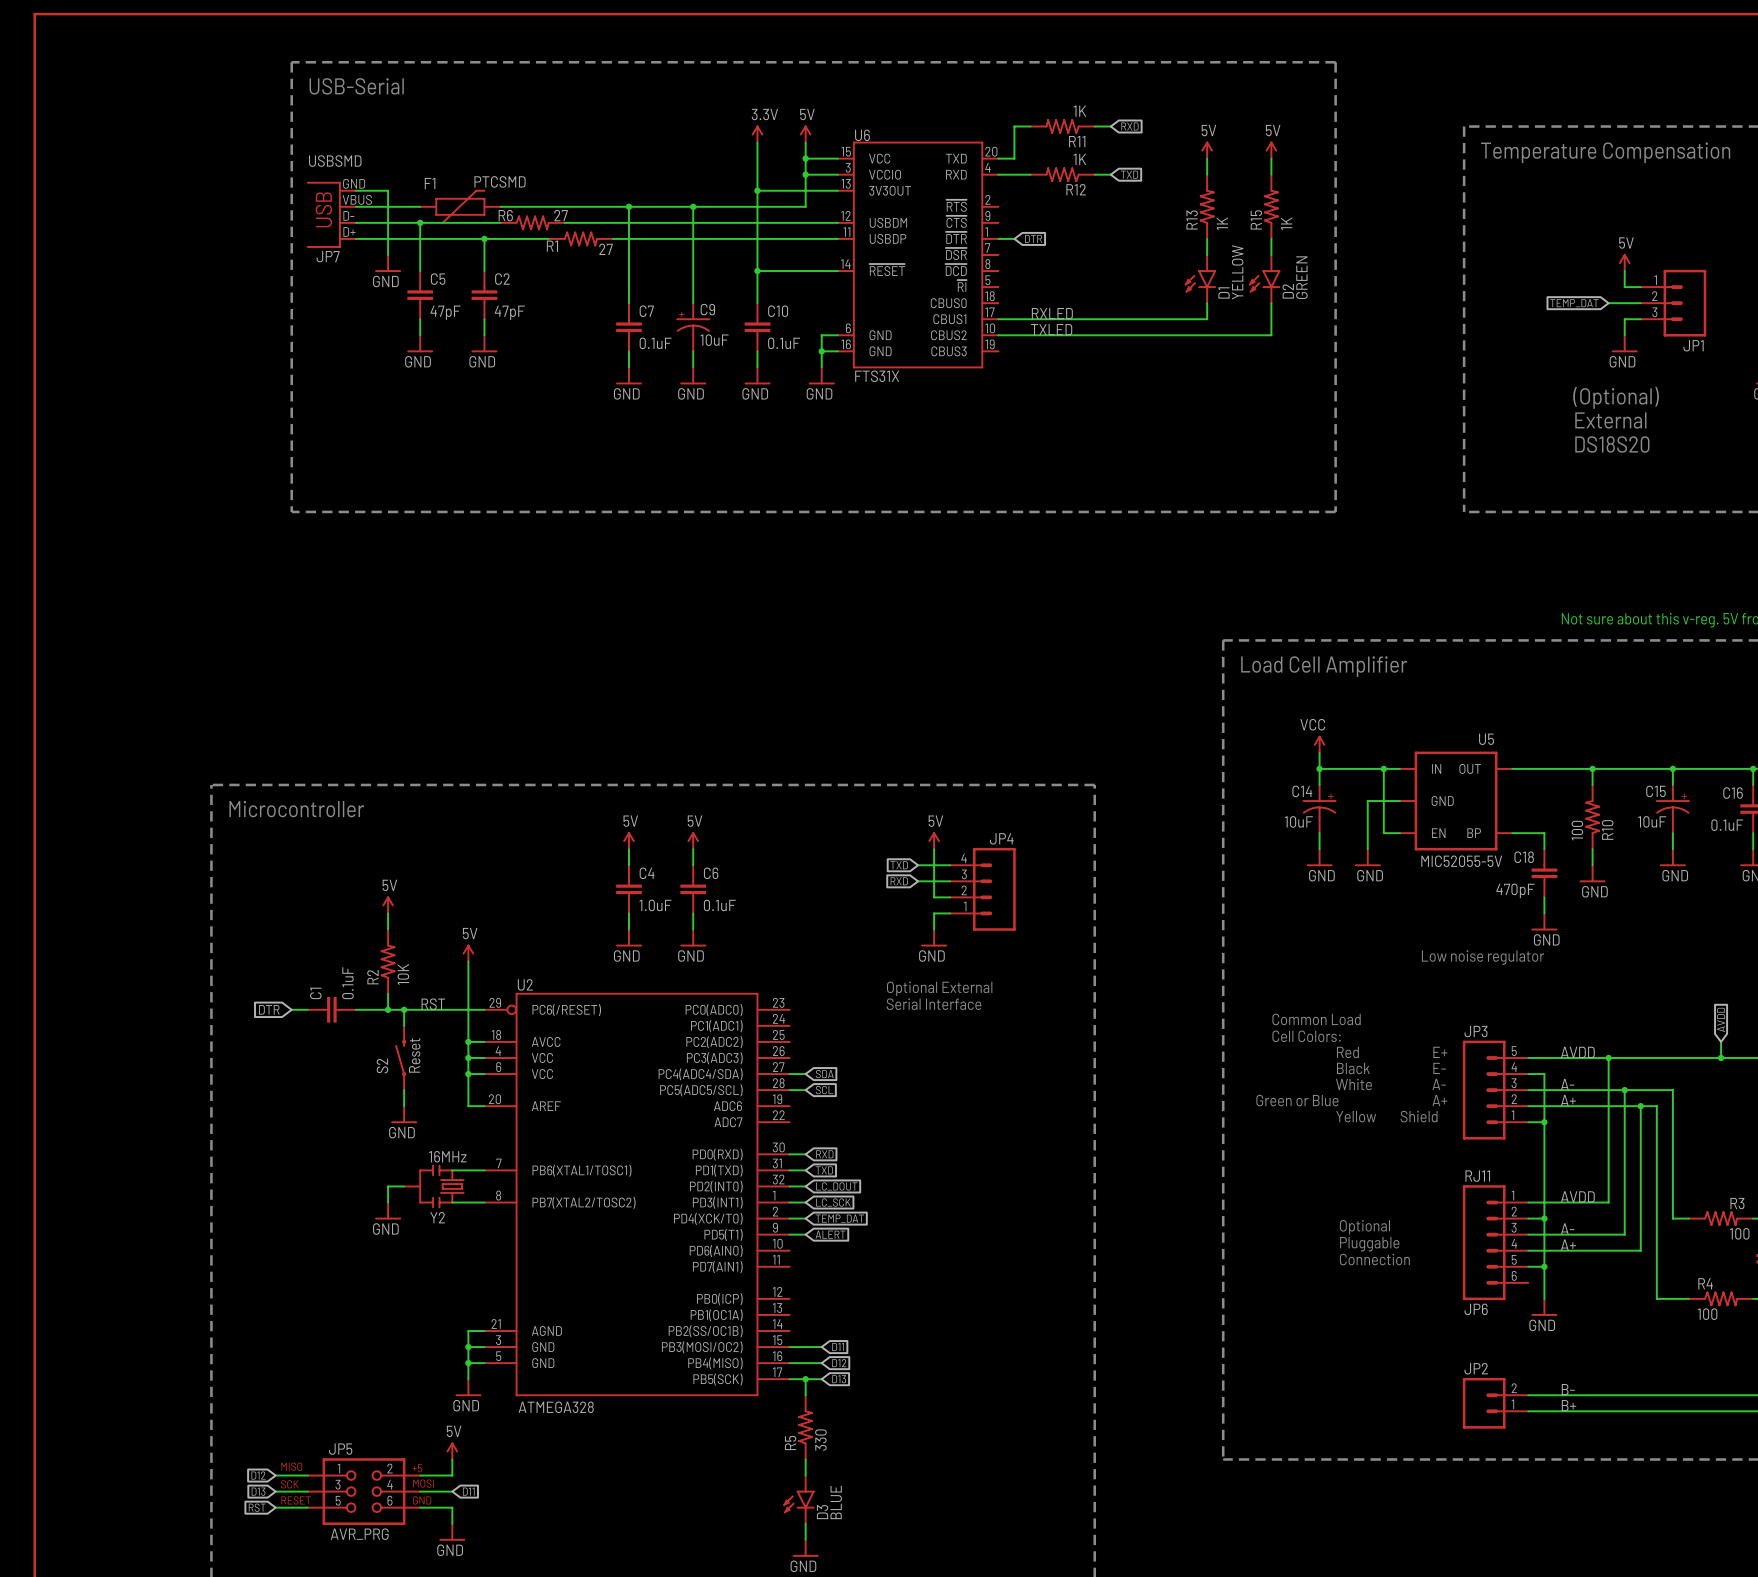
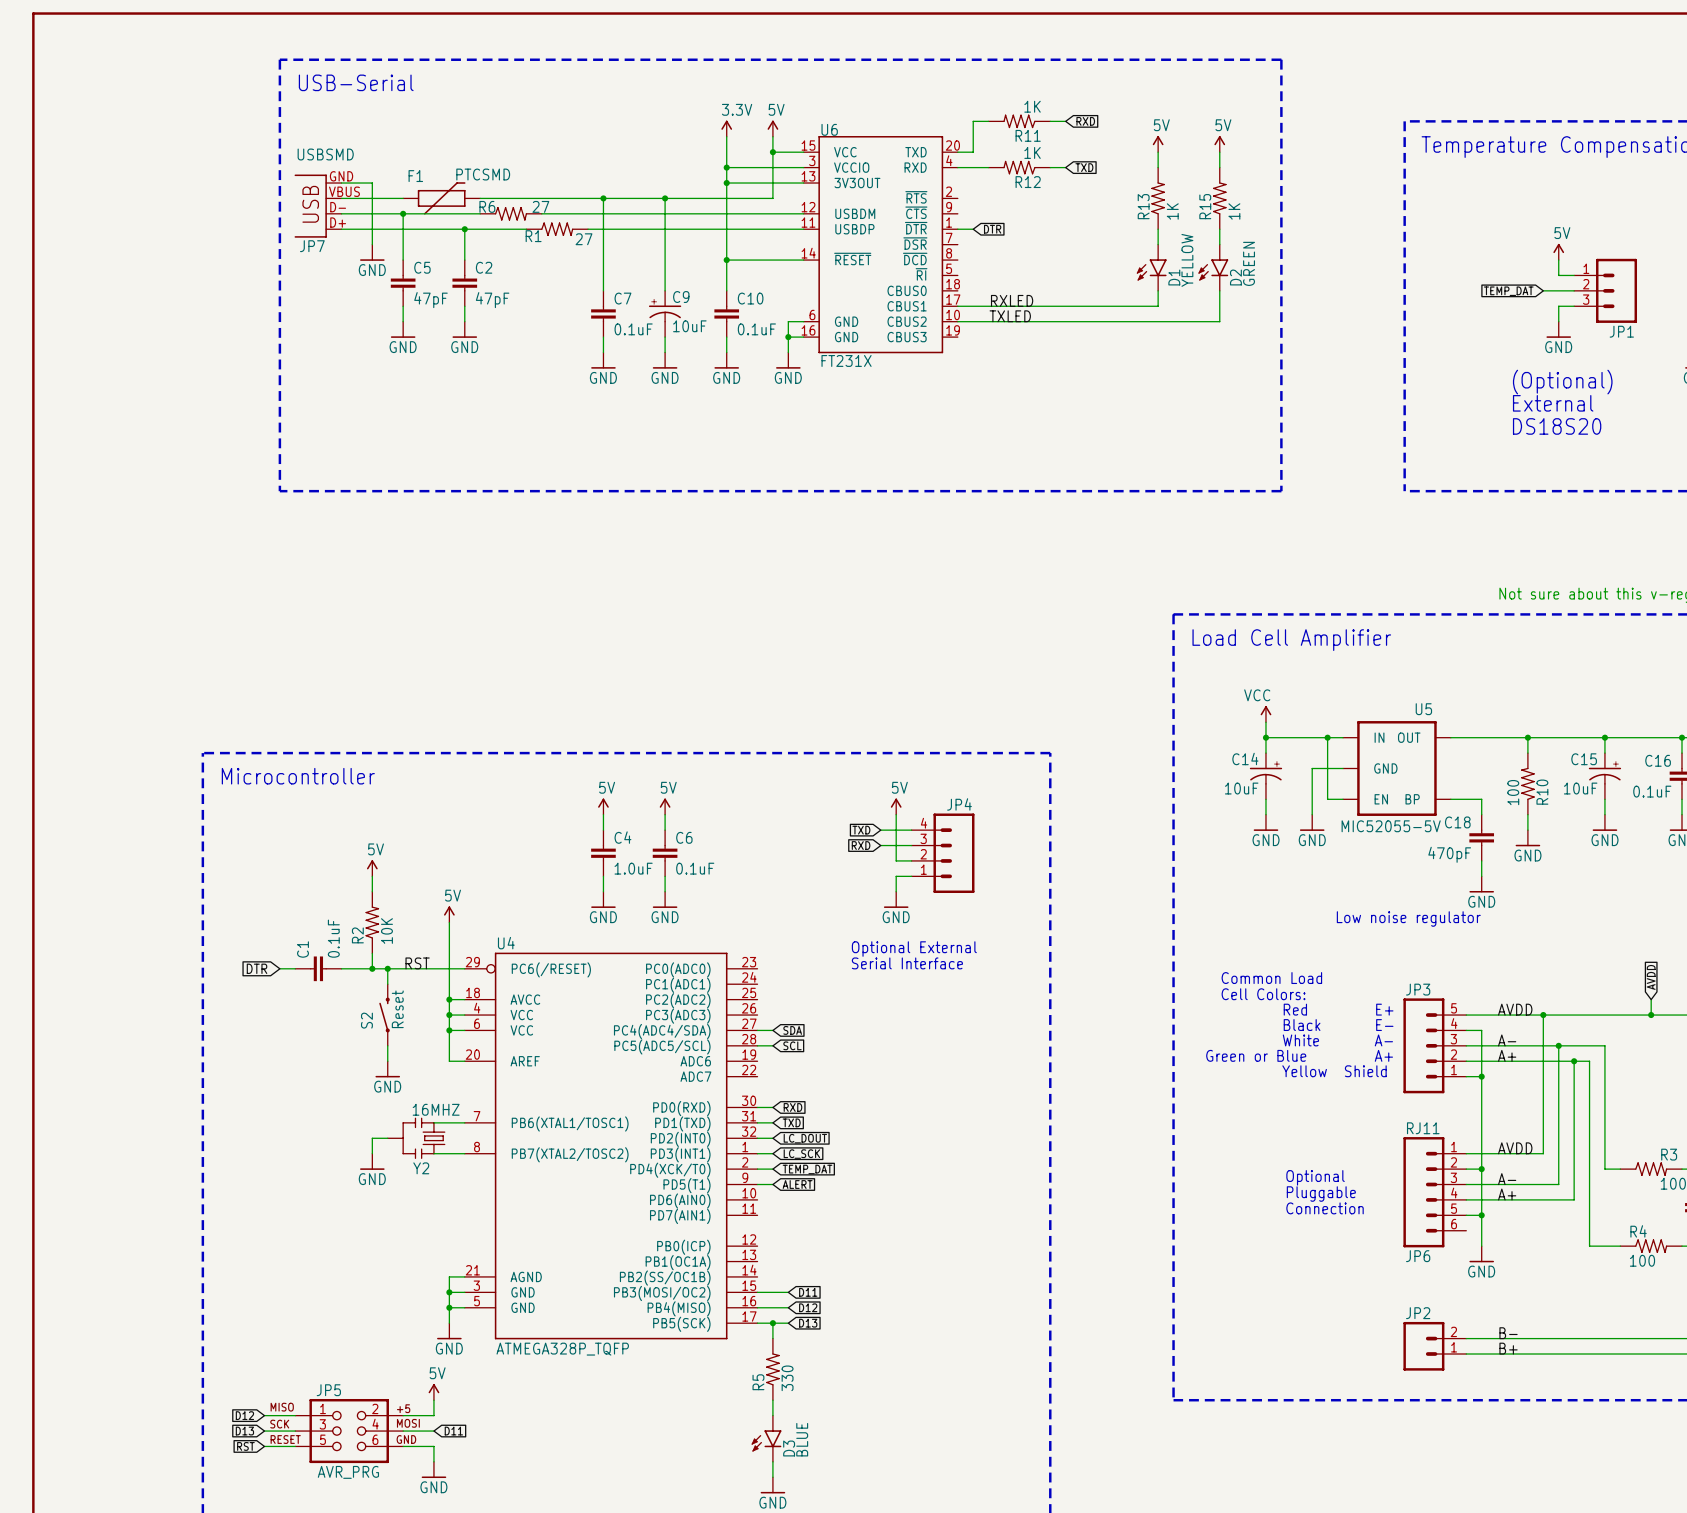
wire: none -> (726, 167) (772, 167)
junction: none -> (726, 167)
junction: (805, 174) -> none
U6 value: FTS31X (877, 376) -> FT231X (846, 360)
U2 name: U2 (525, 984) -> U4 (506, 943)
Y2 value: 16MHz (447, 1156) -> 16MHZ (436, 1109)
U2 value: ATMEGA328 (556, 1407) -> ATMEGA328P_TQFP (562, 1349)

